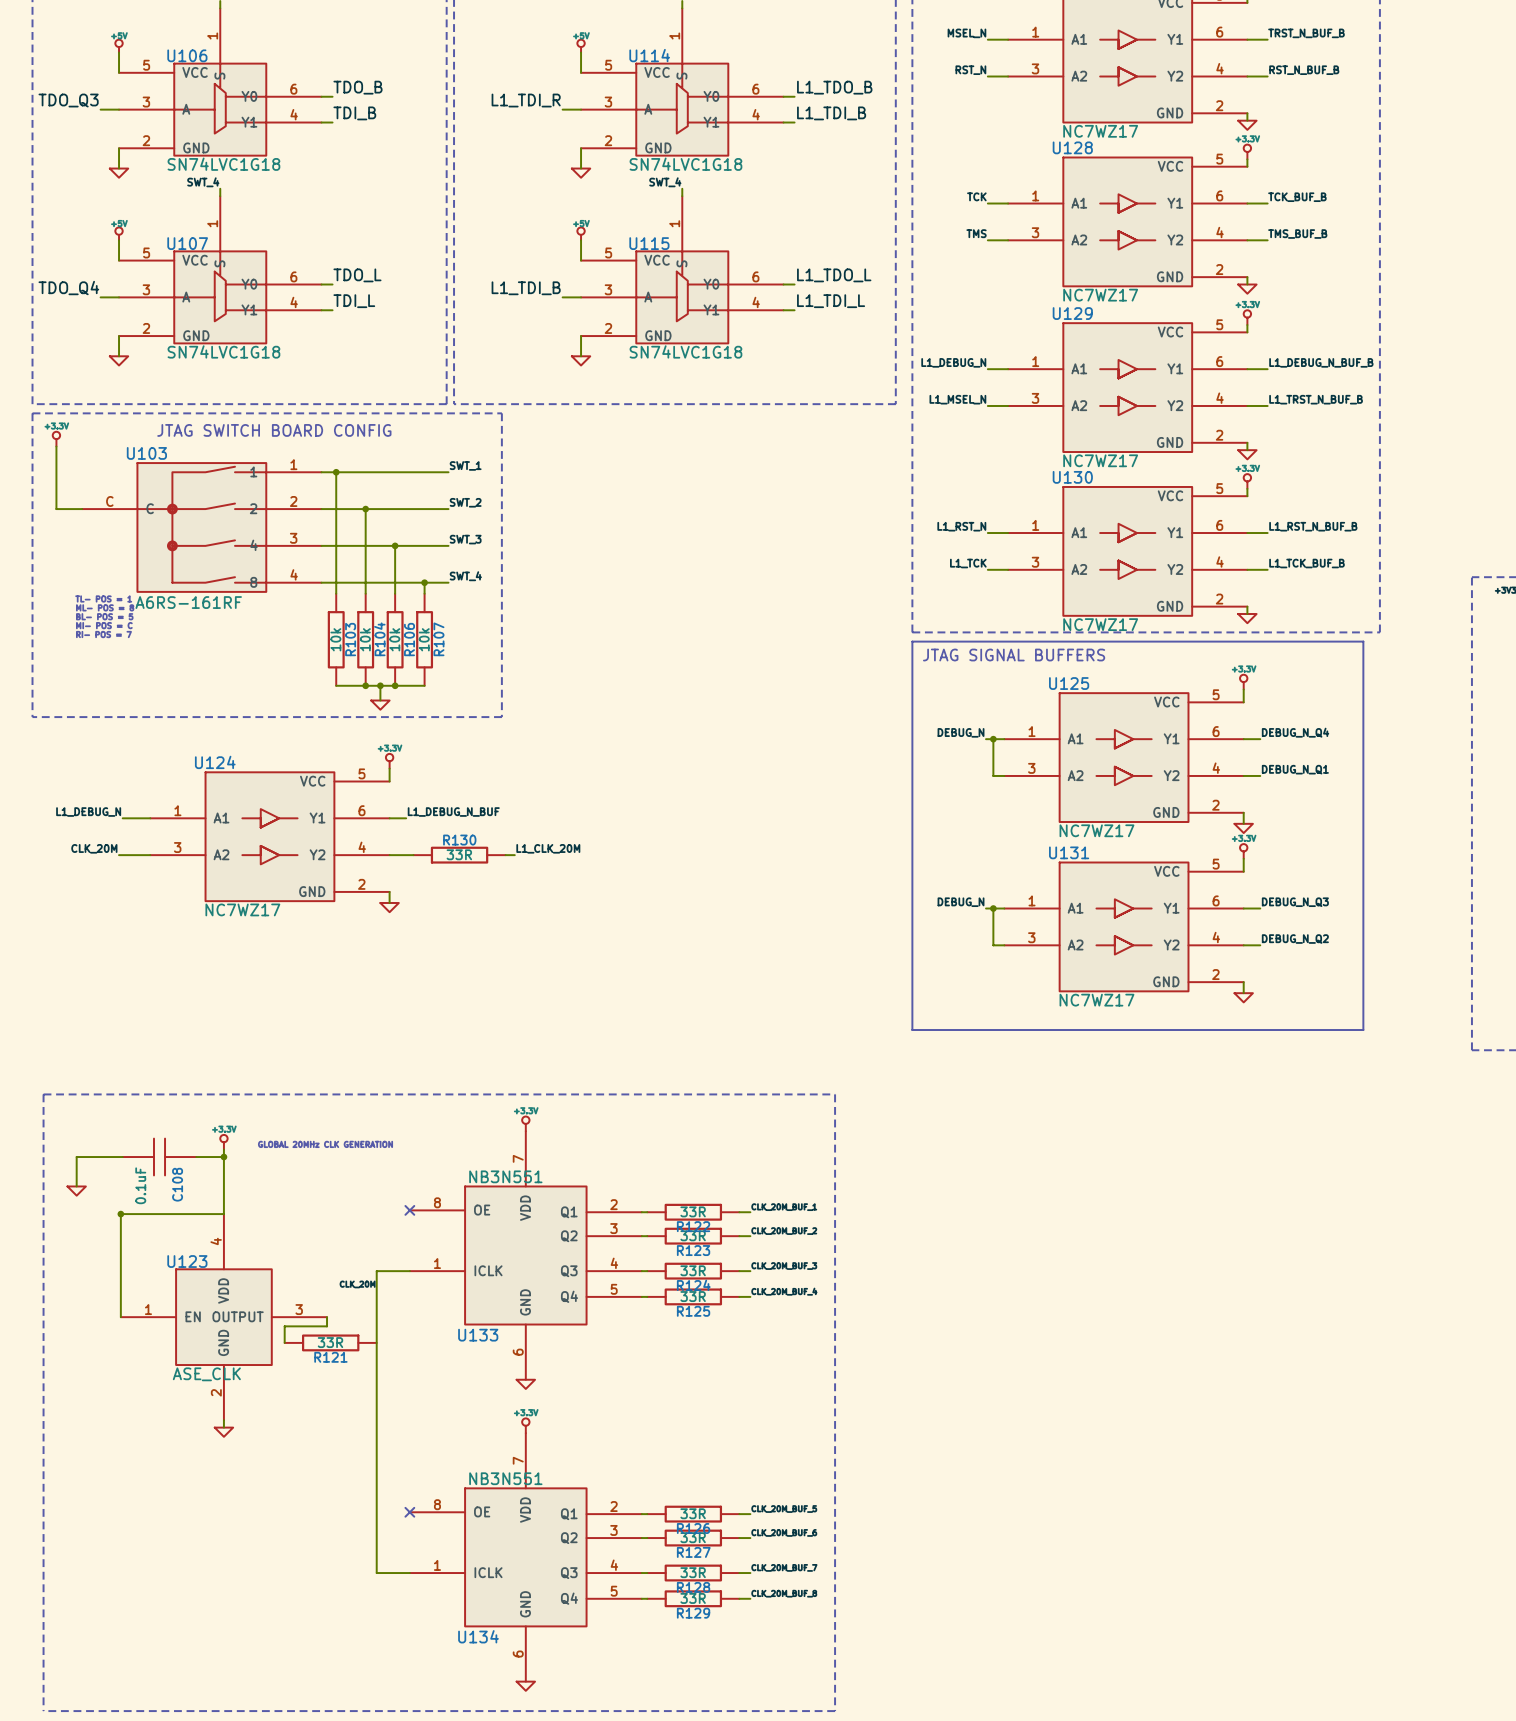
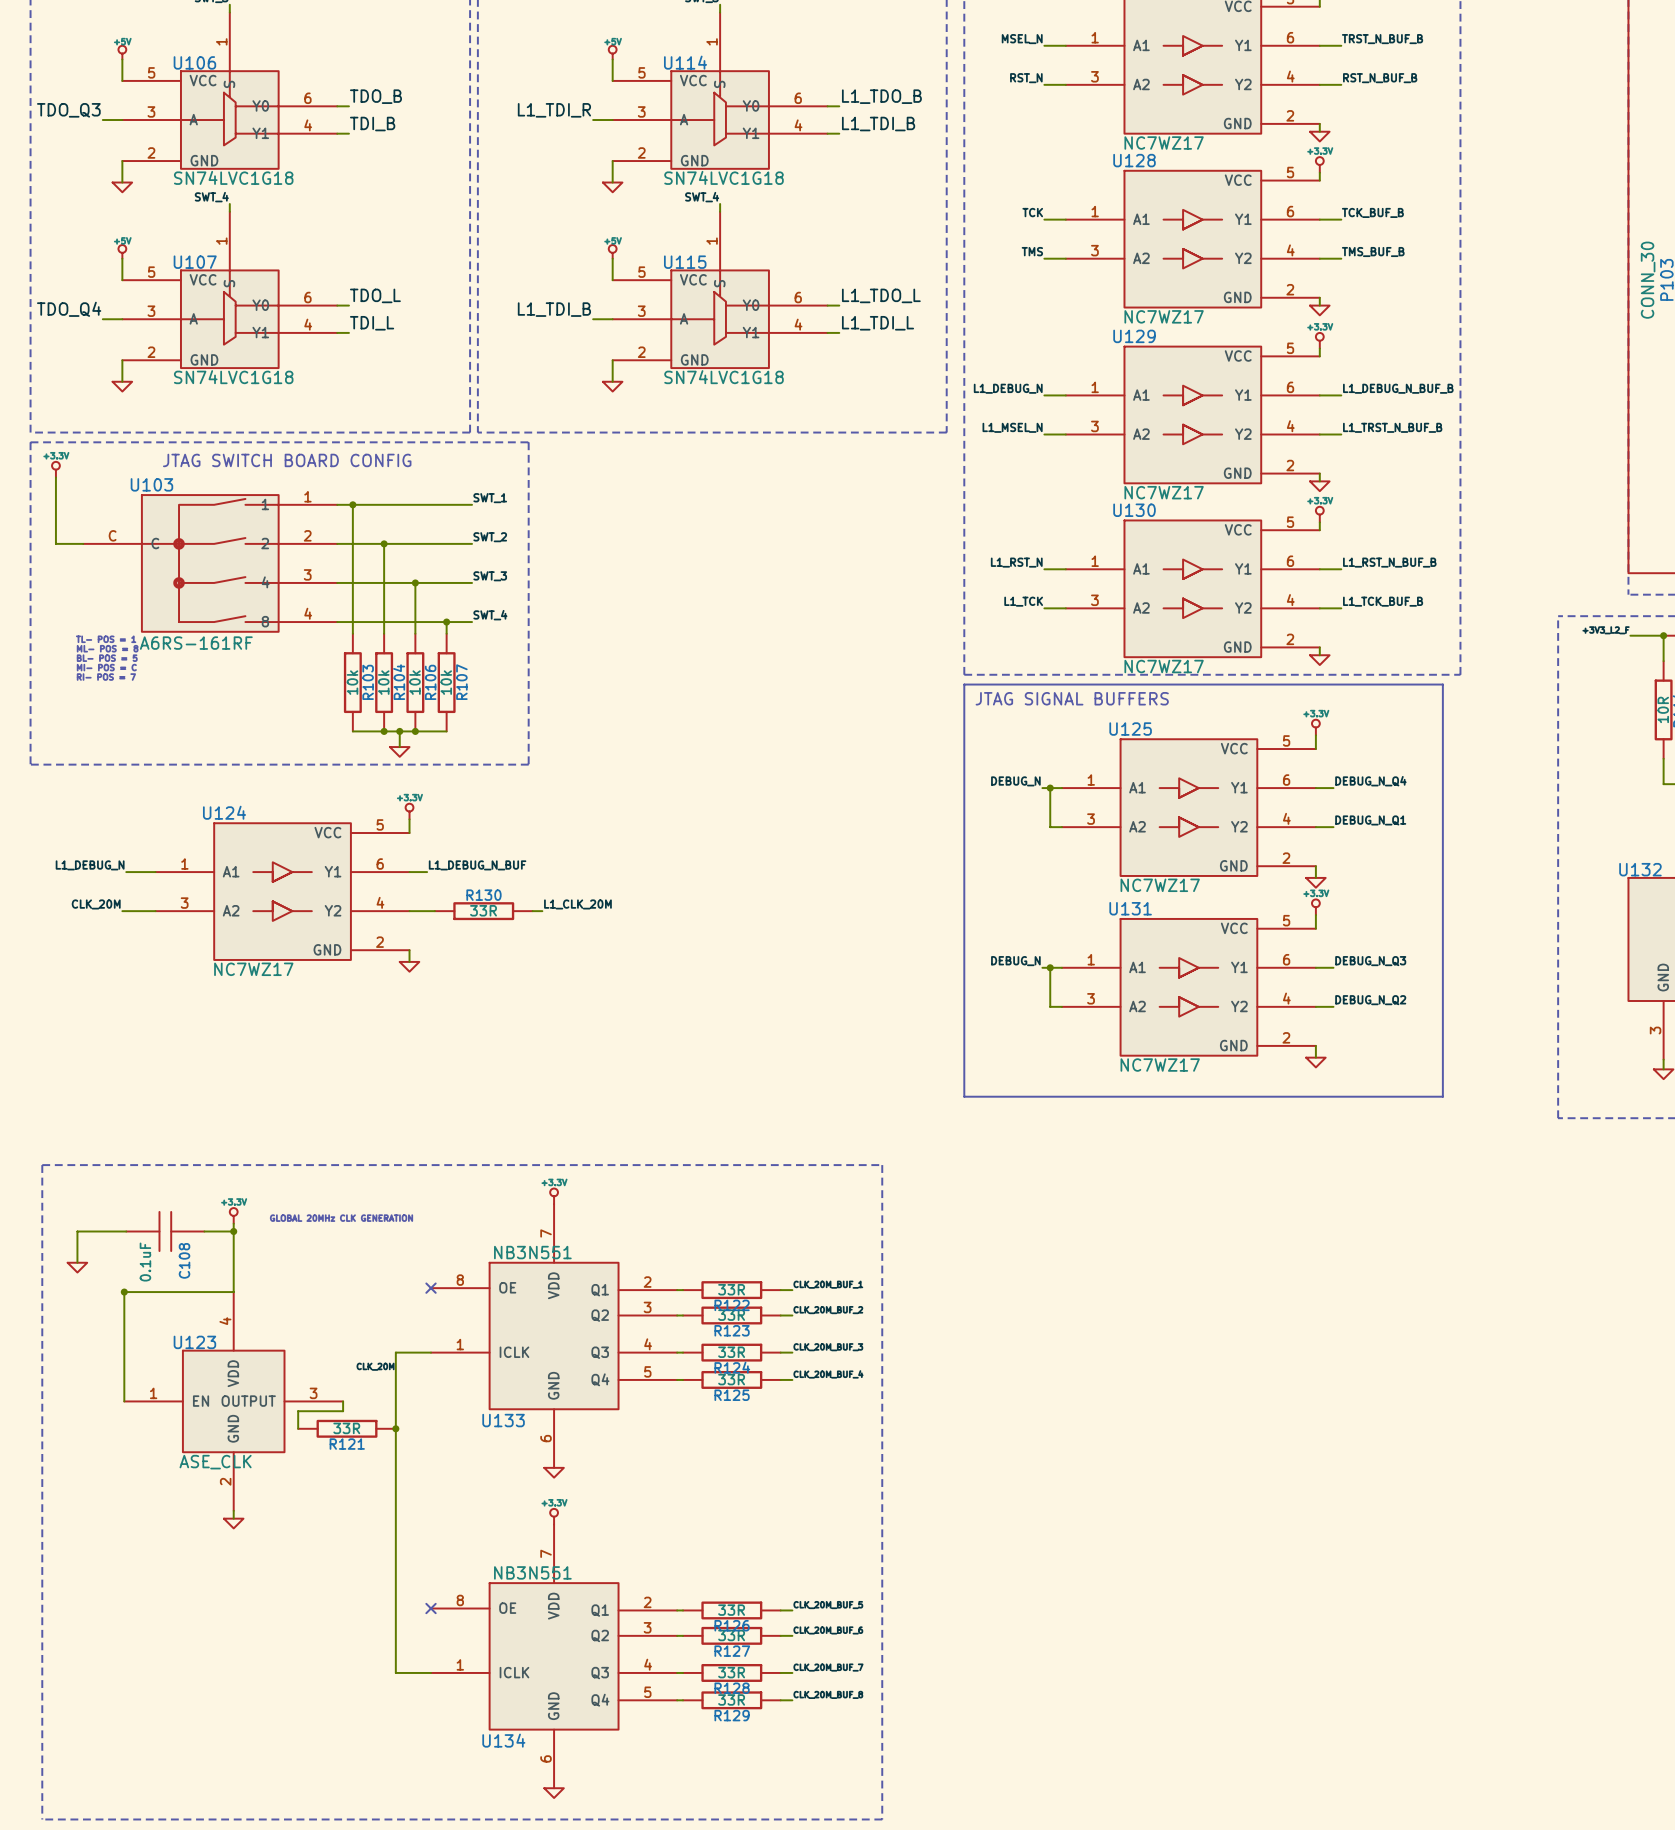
junction: none -> (395, 1428)

